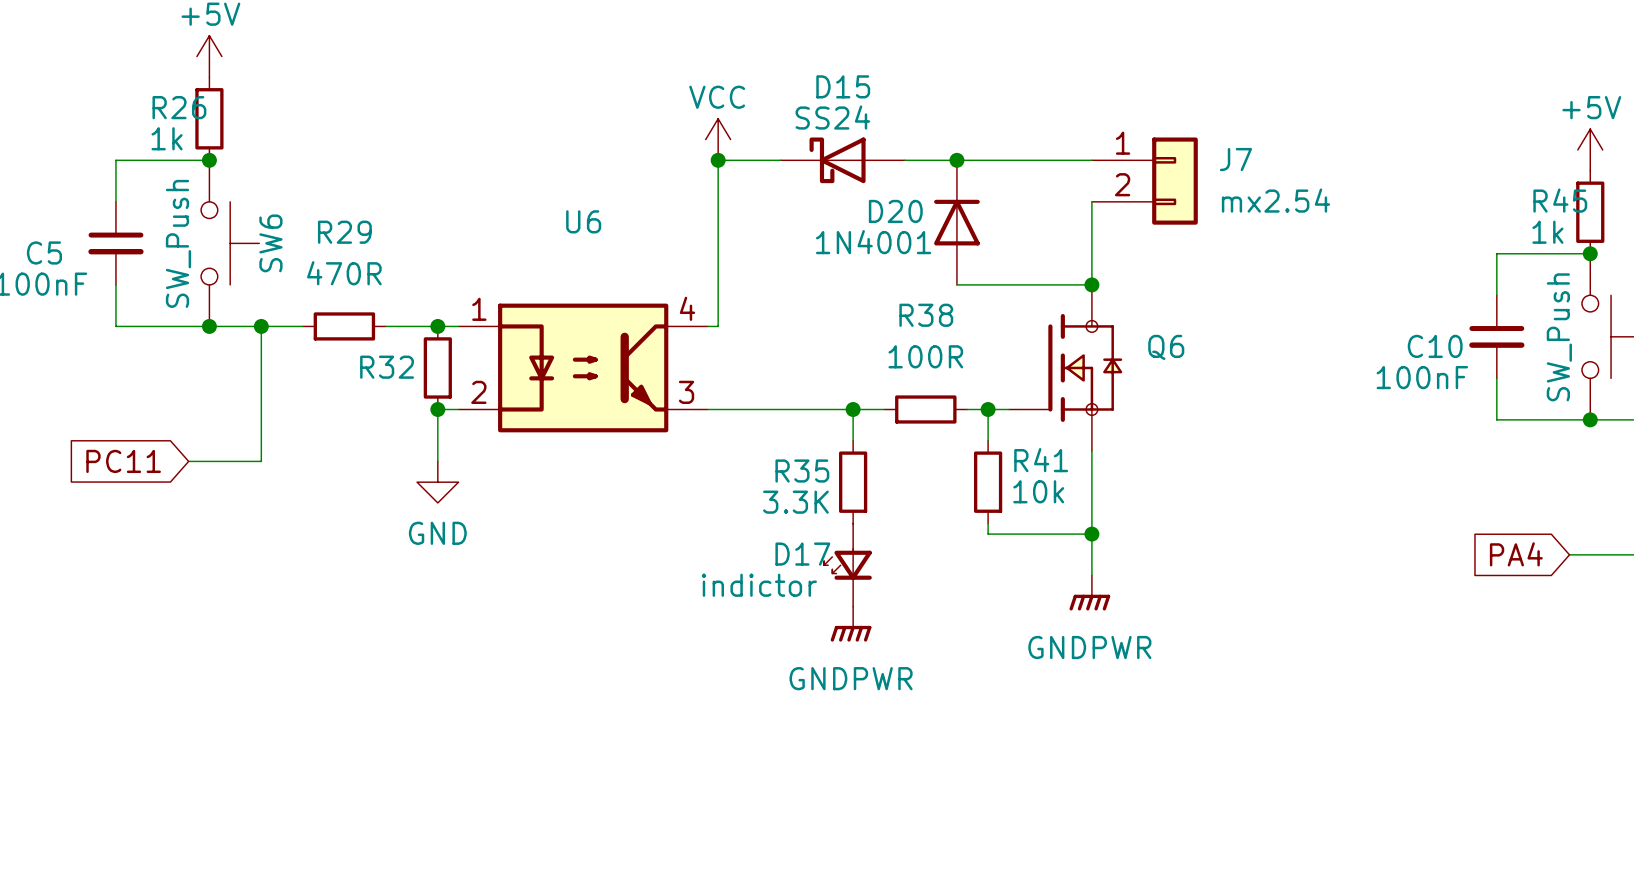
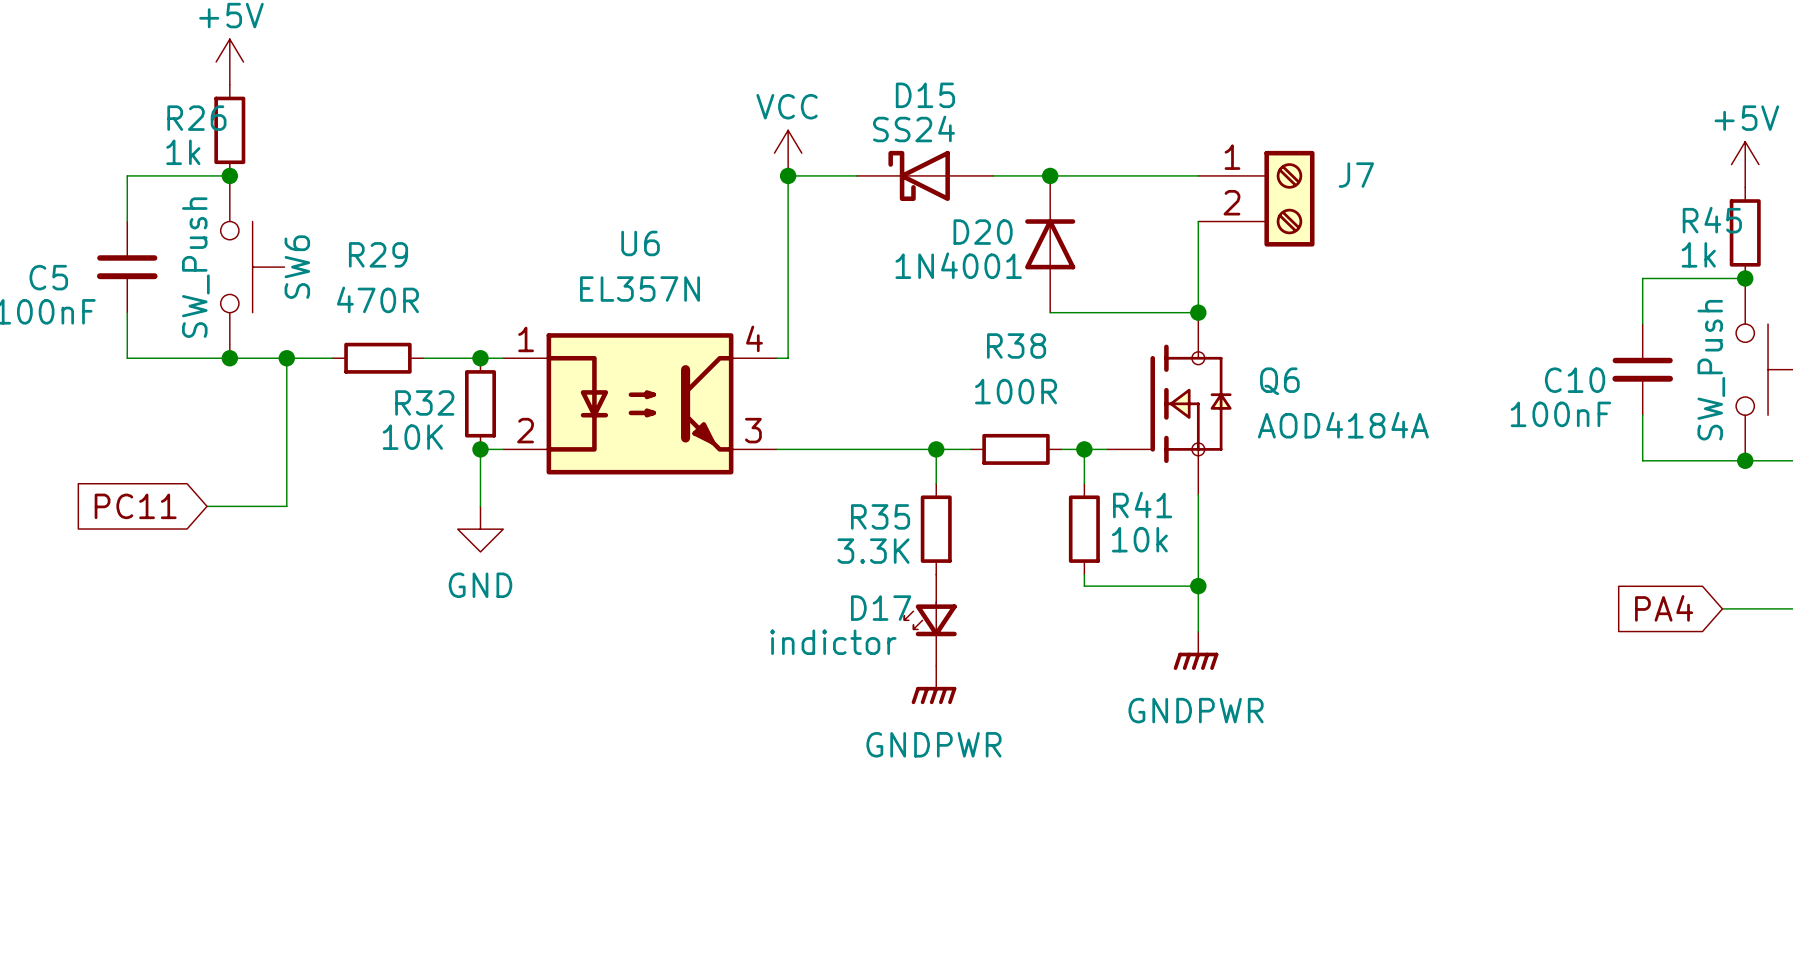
J7 symbol: [1091, 137, 1198, 225] -> [1198, 150, 1315, 247]
J7 value: mx2.54 (1275, 200) -> none
U6 value: none -> EL357N (640, 289)
Q6 value: none -> AOD4184A (1343, 425)
R32 value: none -> 10K (412, 437)

